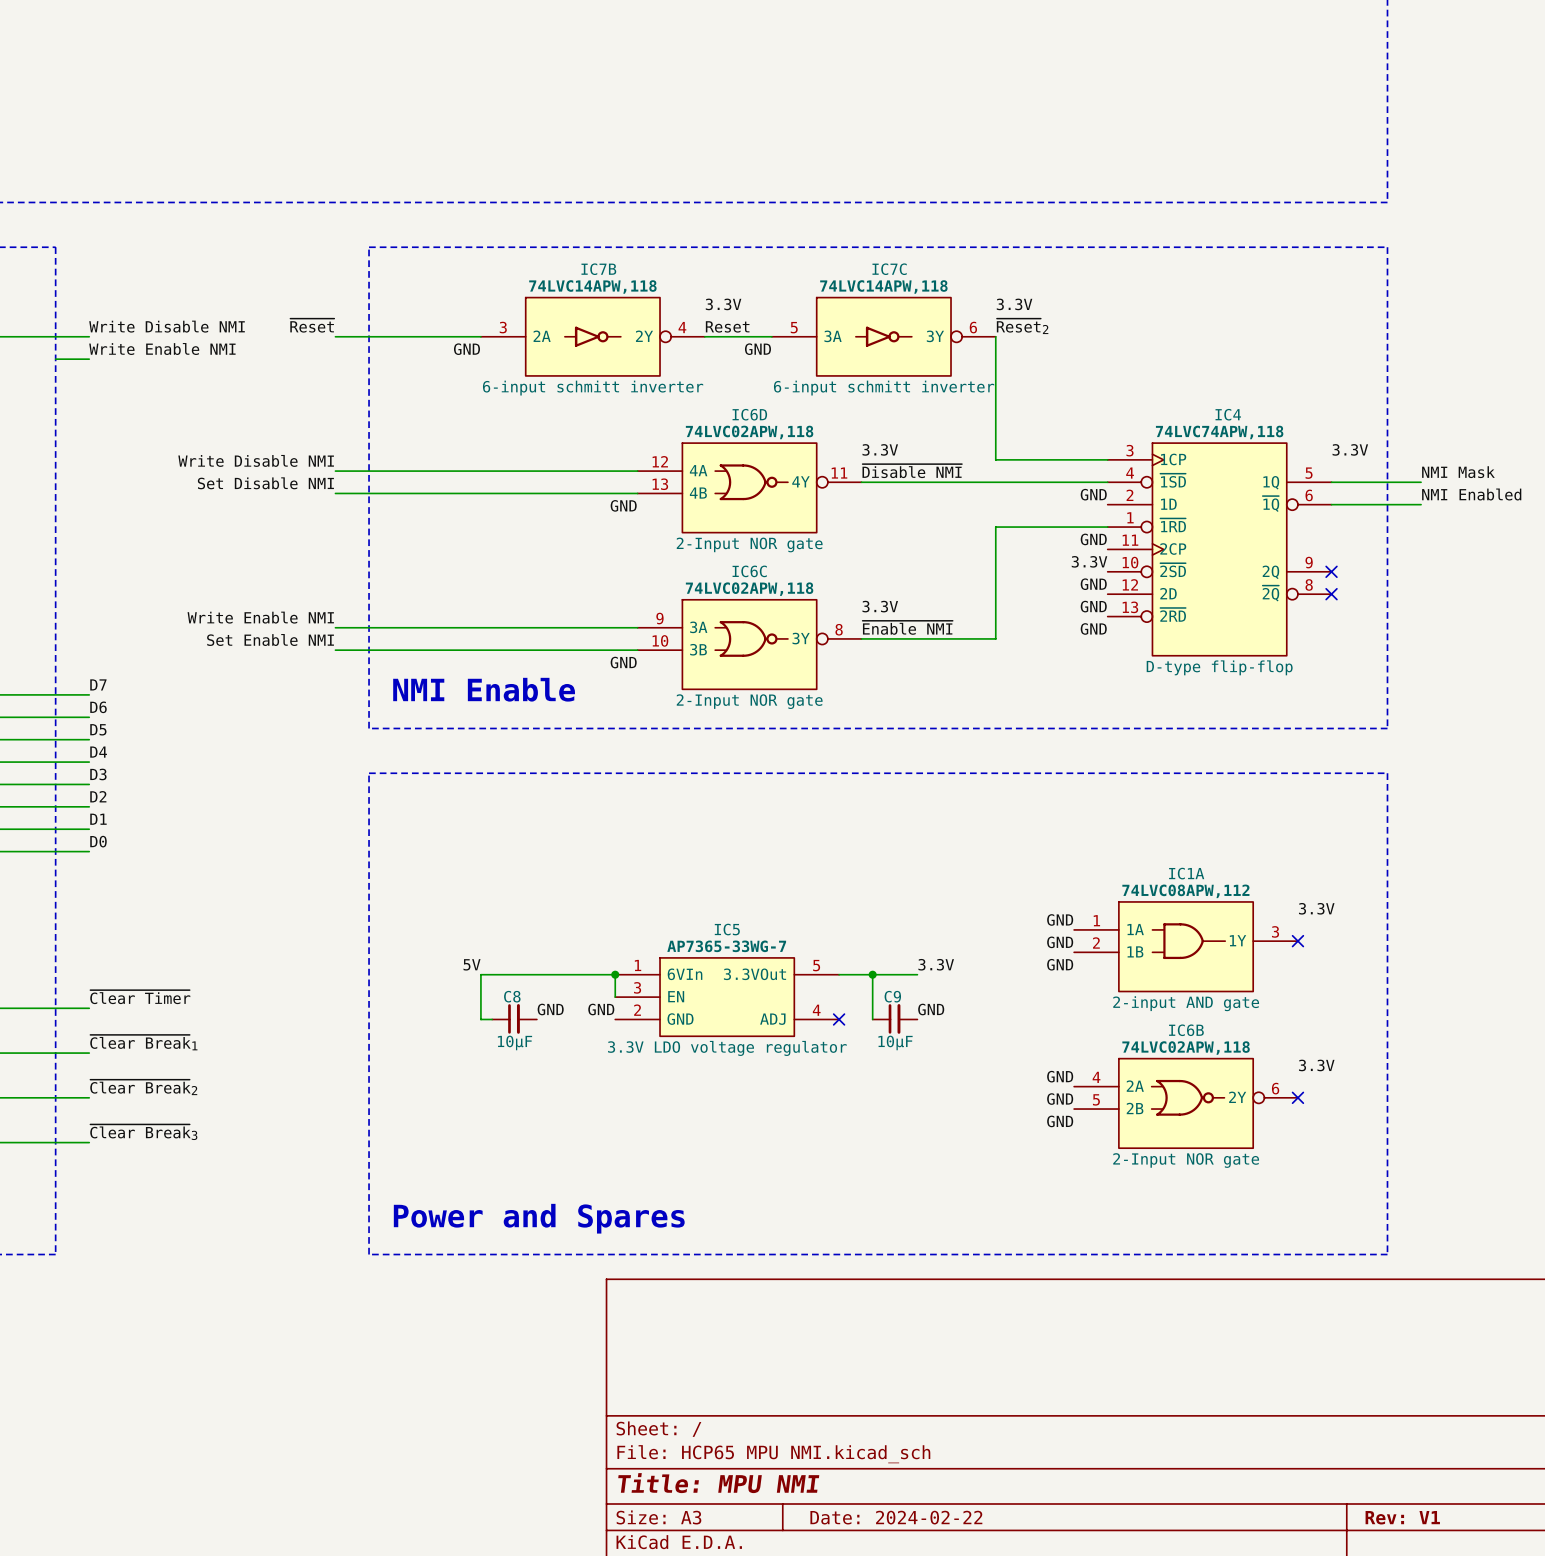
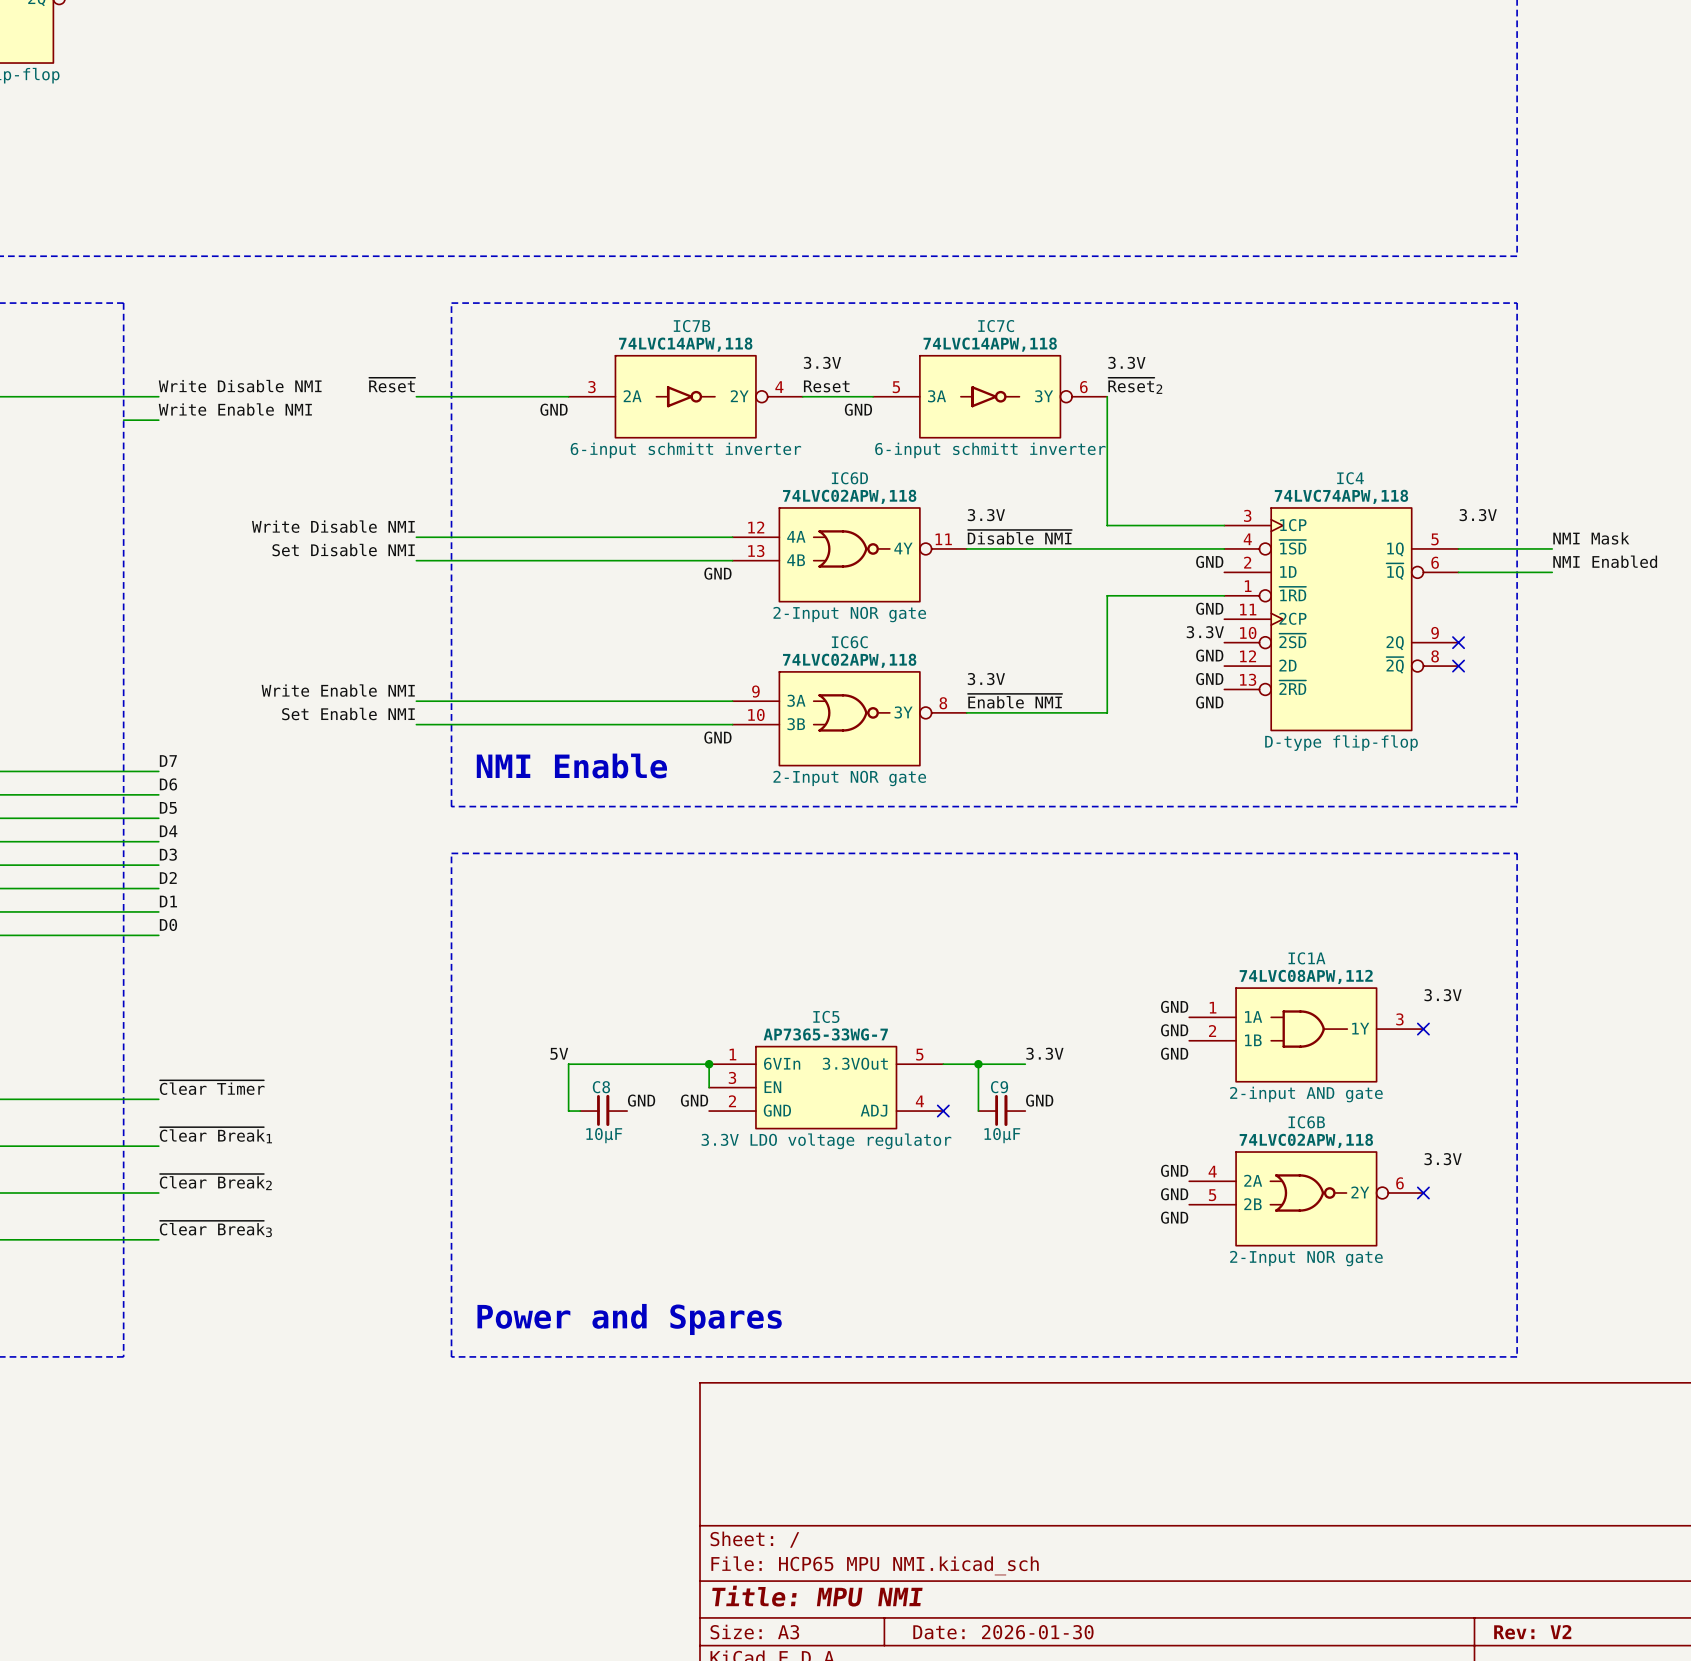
title block: Date: 2024-02-22 (896, 1517) -> Date: 2026-01-30 (1003, 1632)
title block: Rev: V1 (1402, 1517) -> Rev: V2 (1532, 1632)

